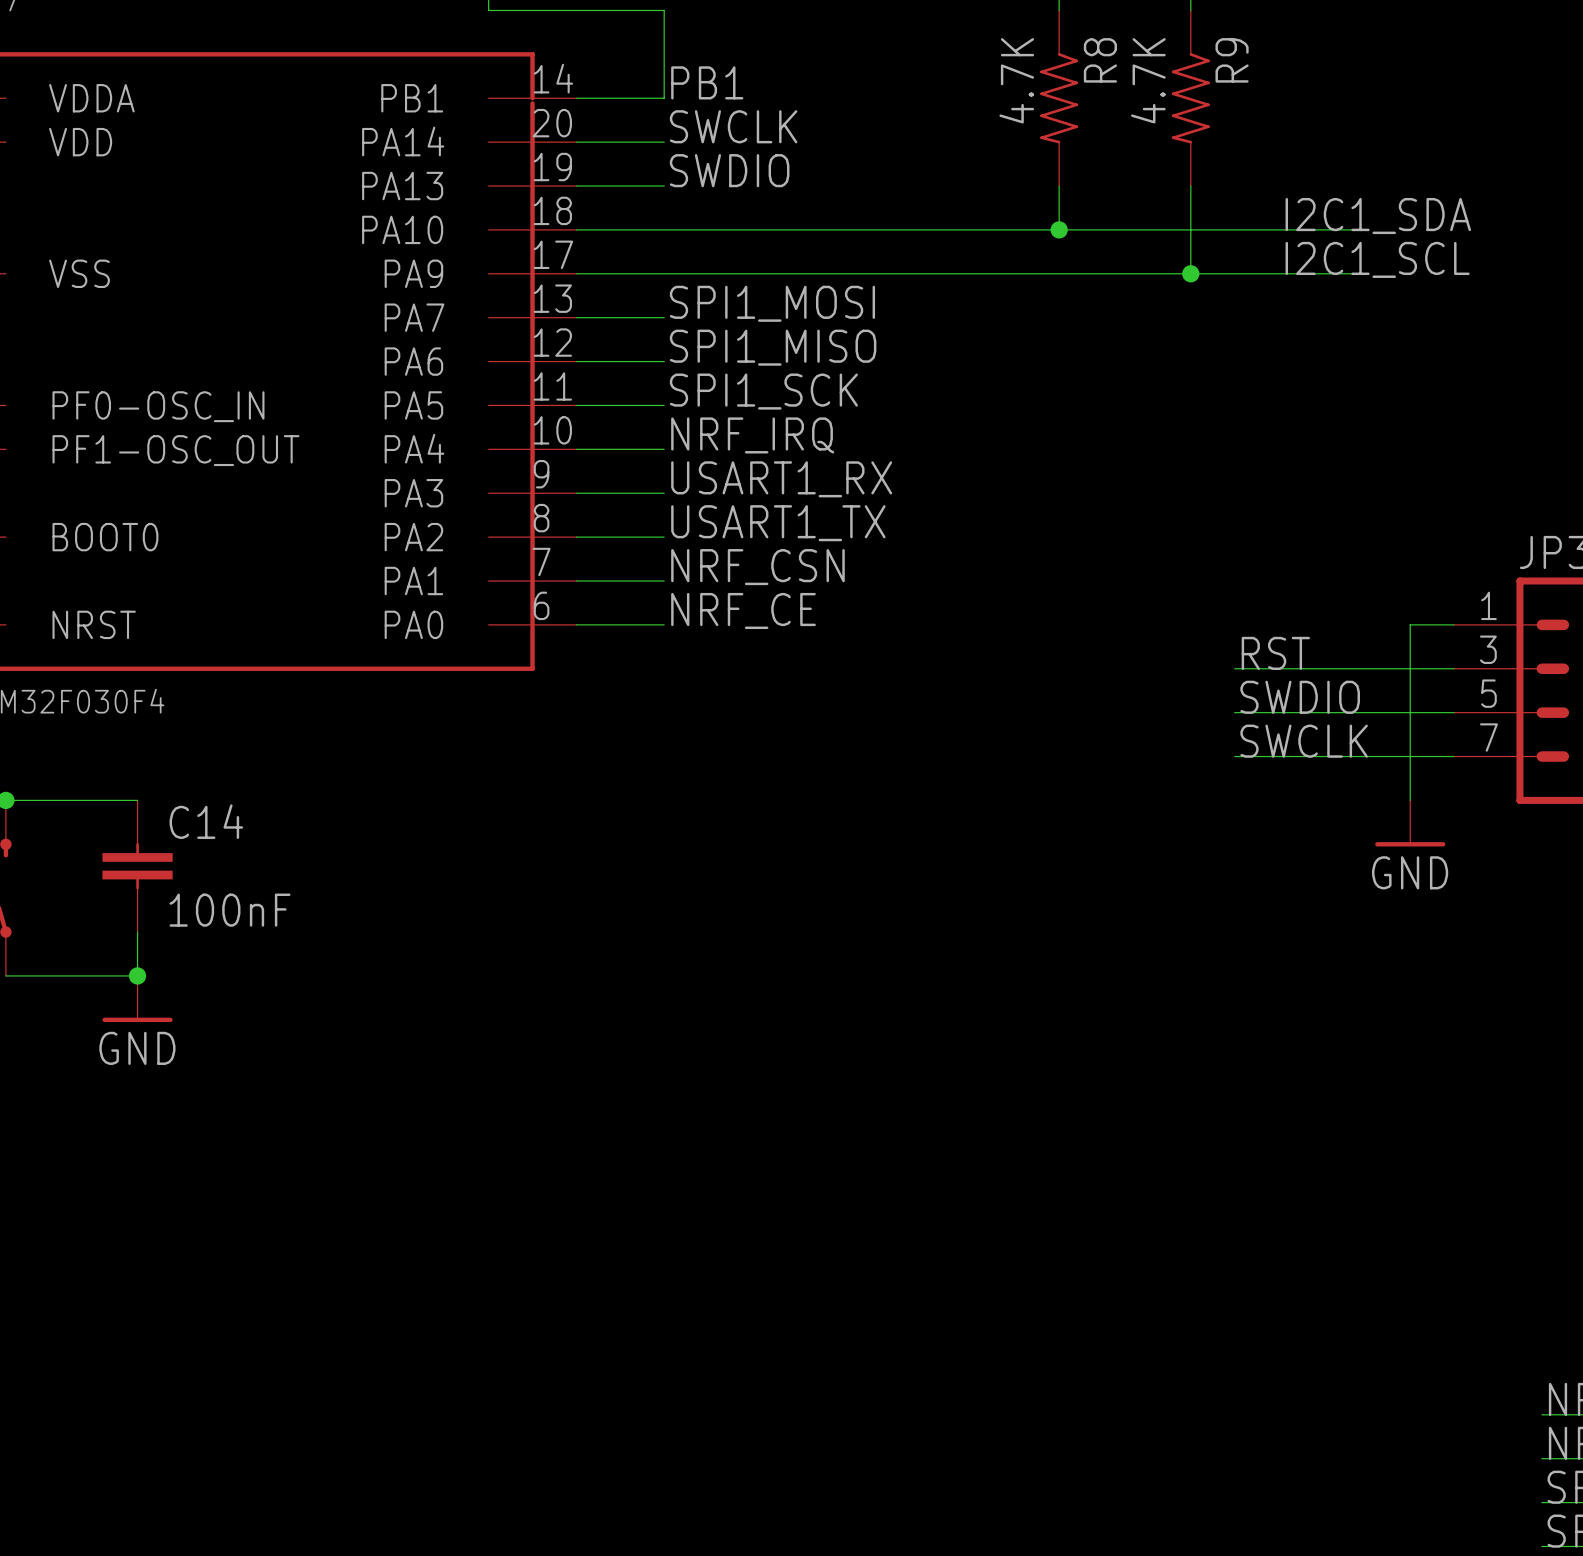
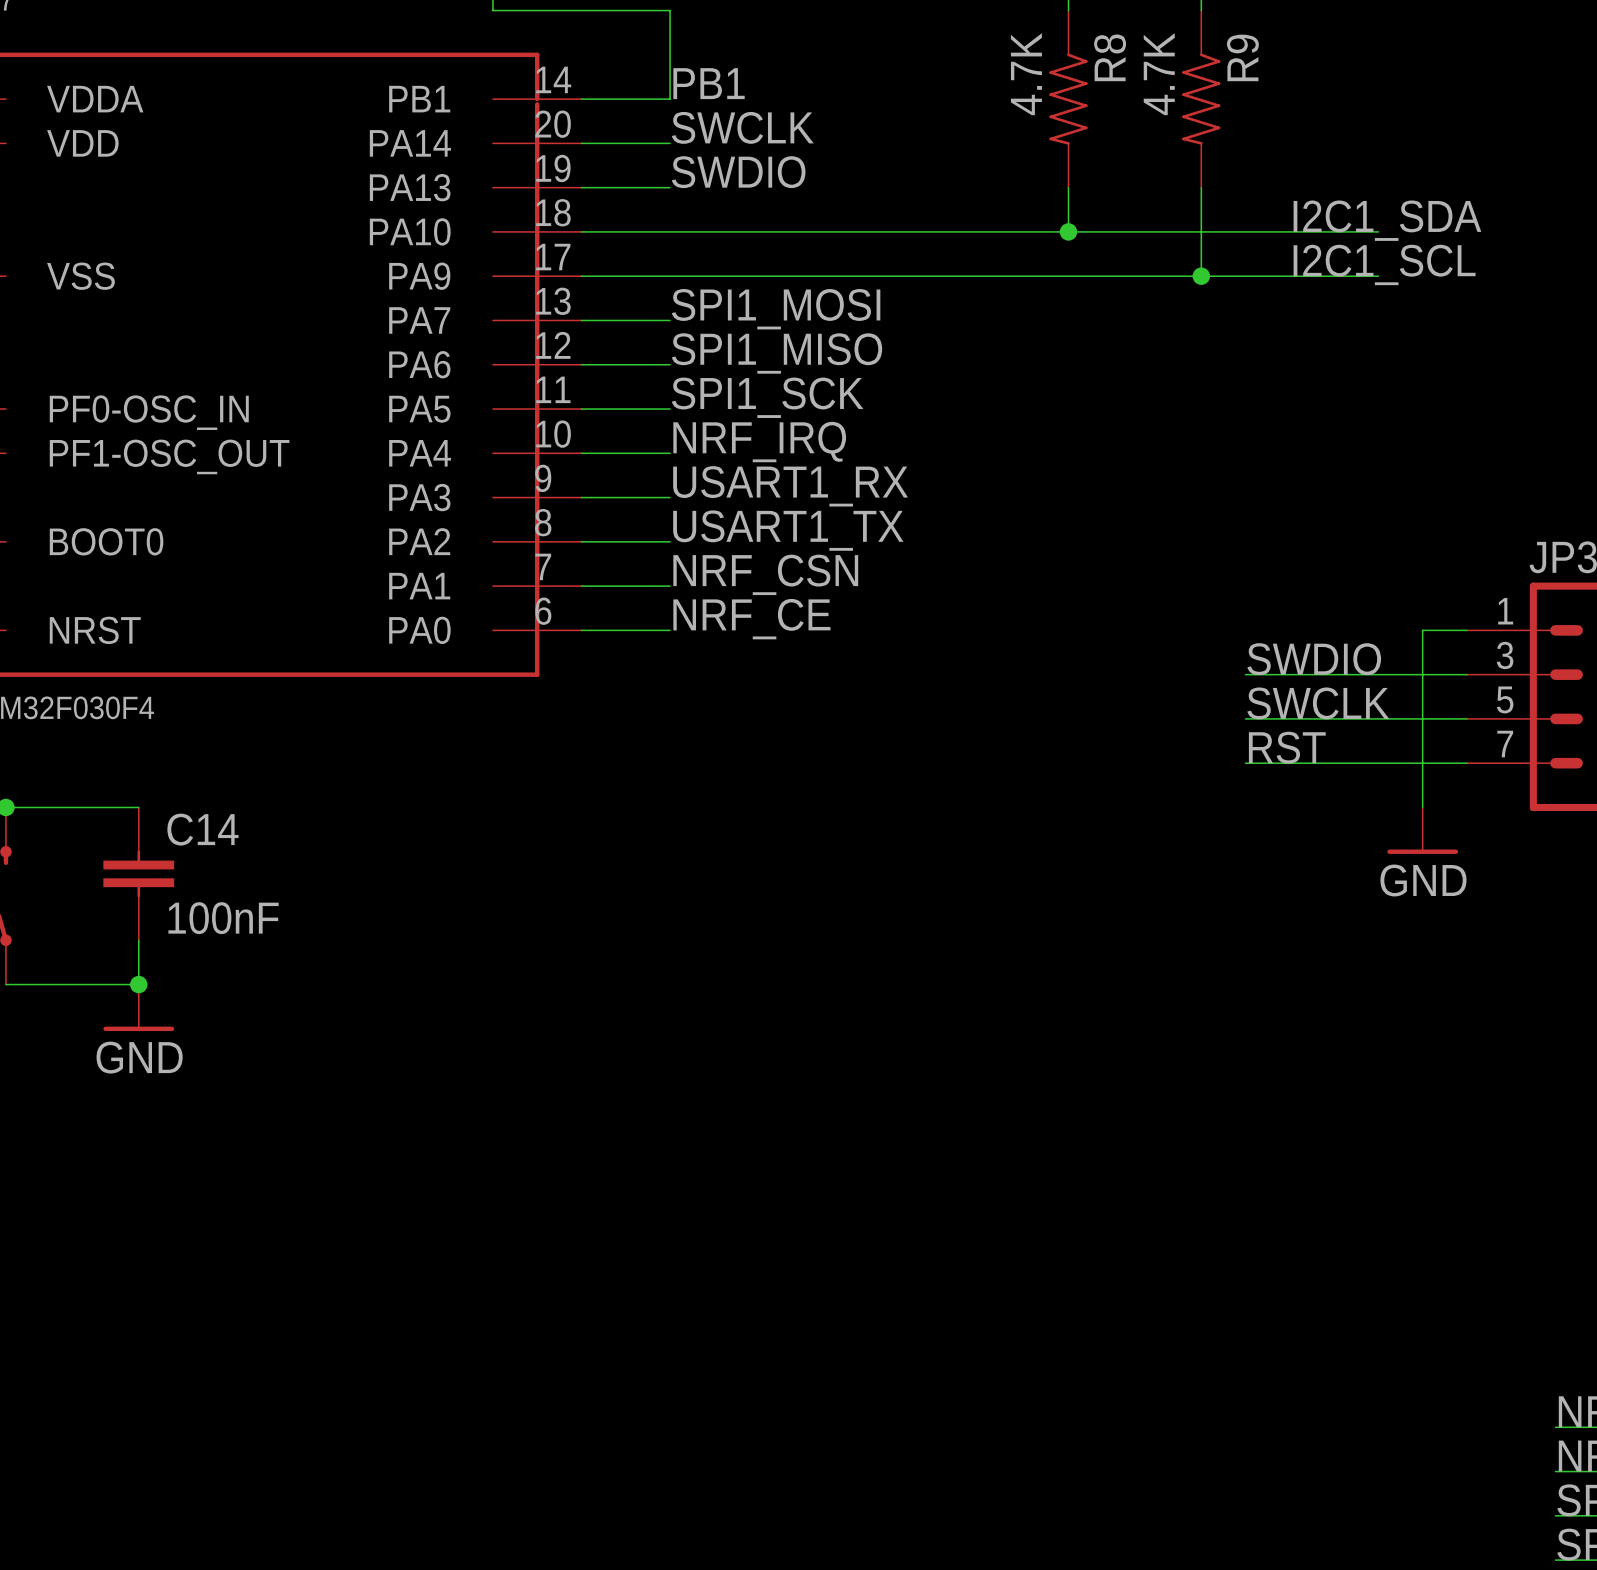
label: RST (1275, 653) -> SWDIO (1314, 659)
label: SWDIO (1300, 697) -> SWCLK (1318, 703)
label: SWCLK (1304, 741) -> RST (1287, 747)

